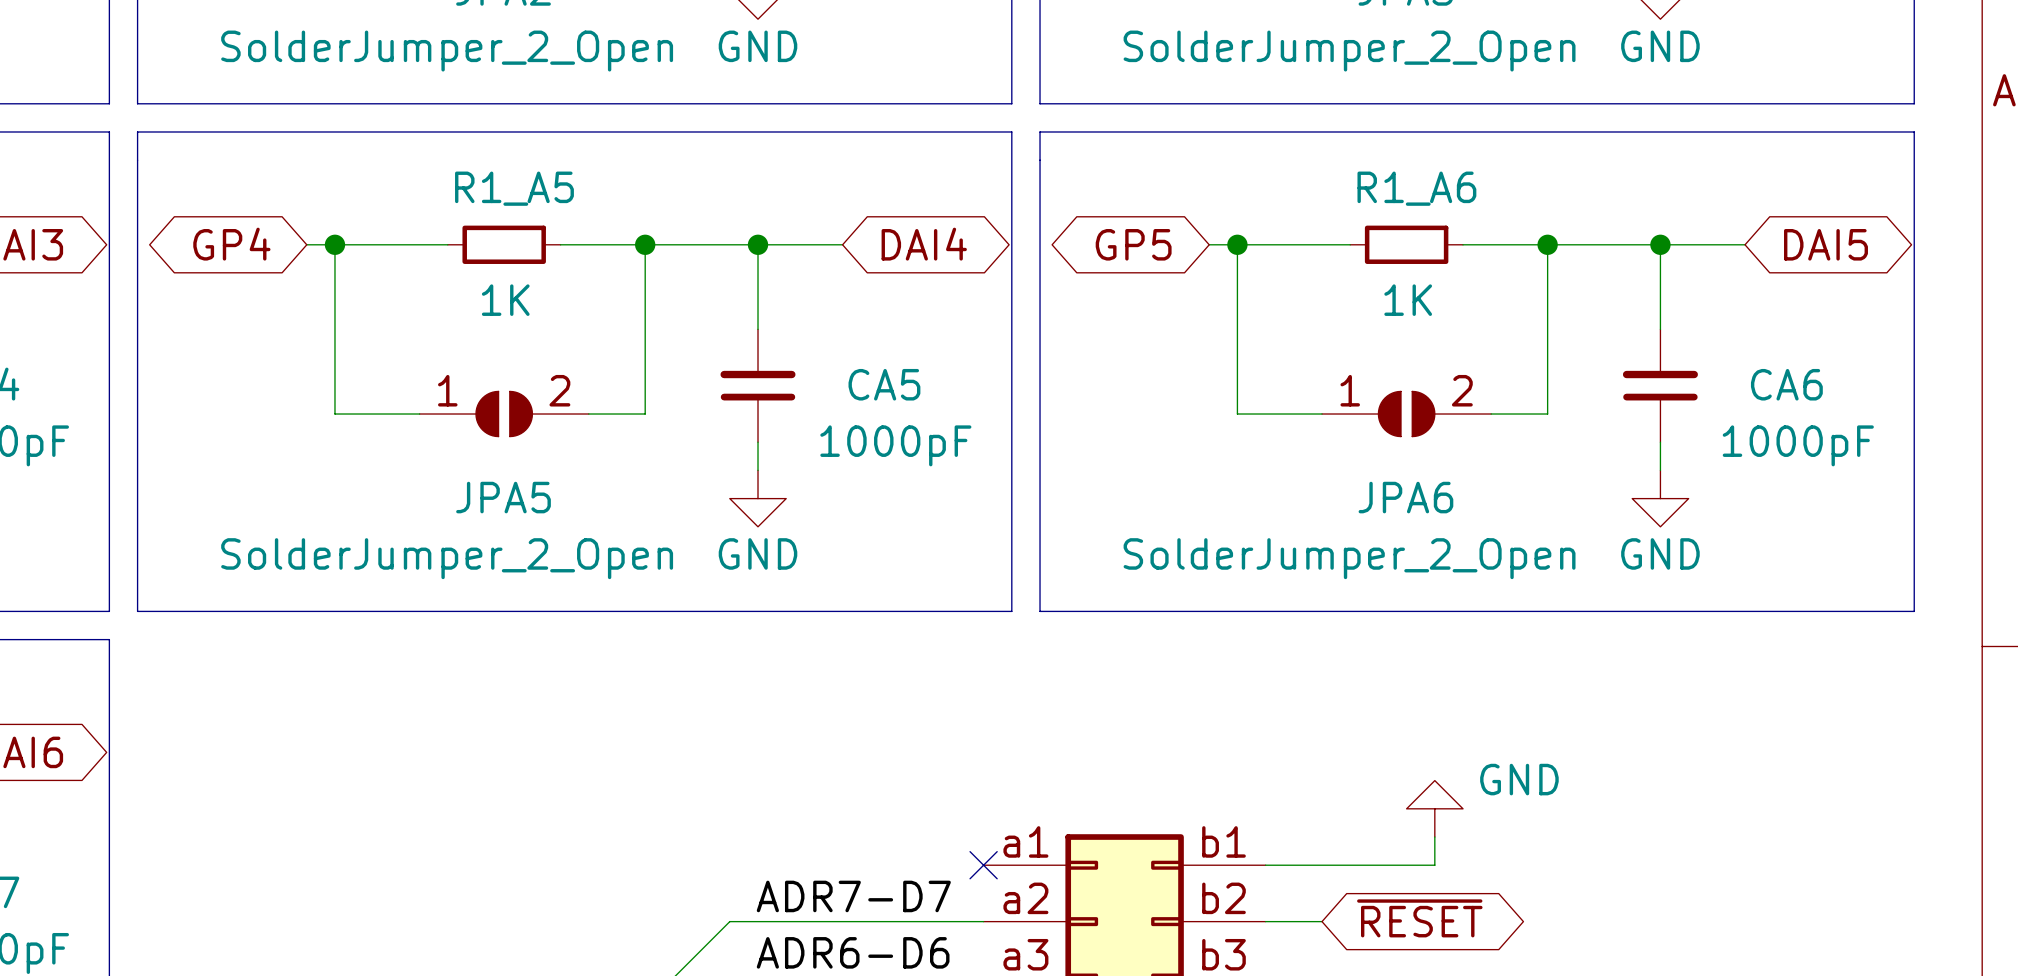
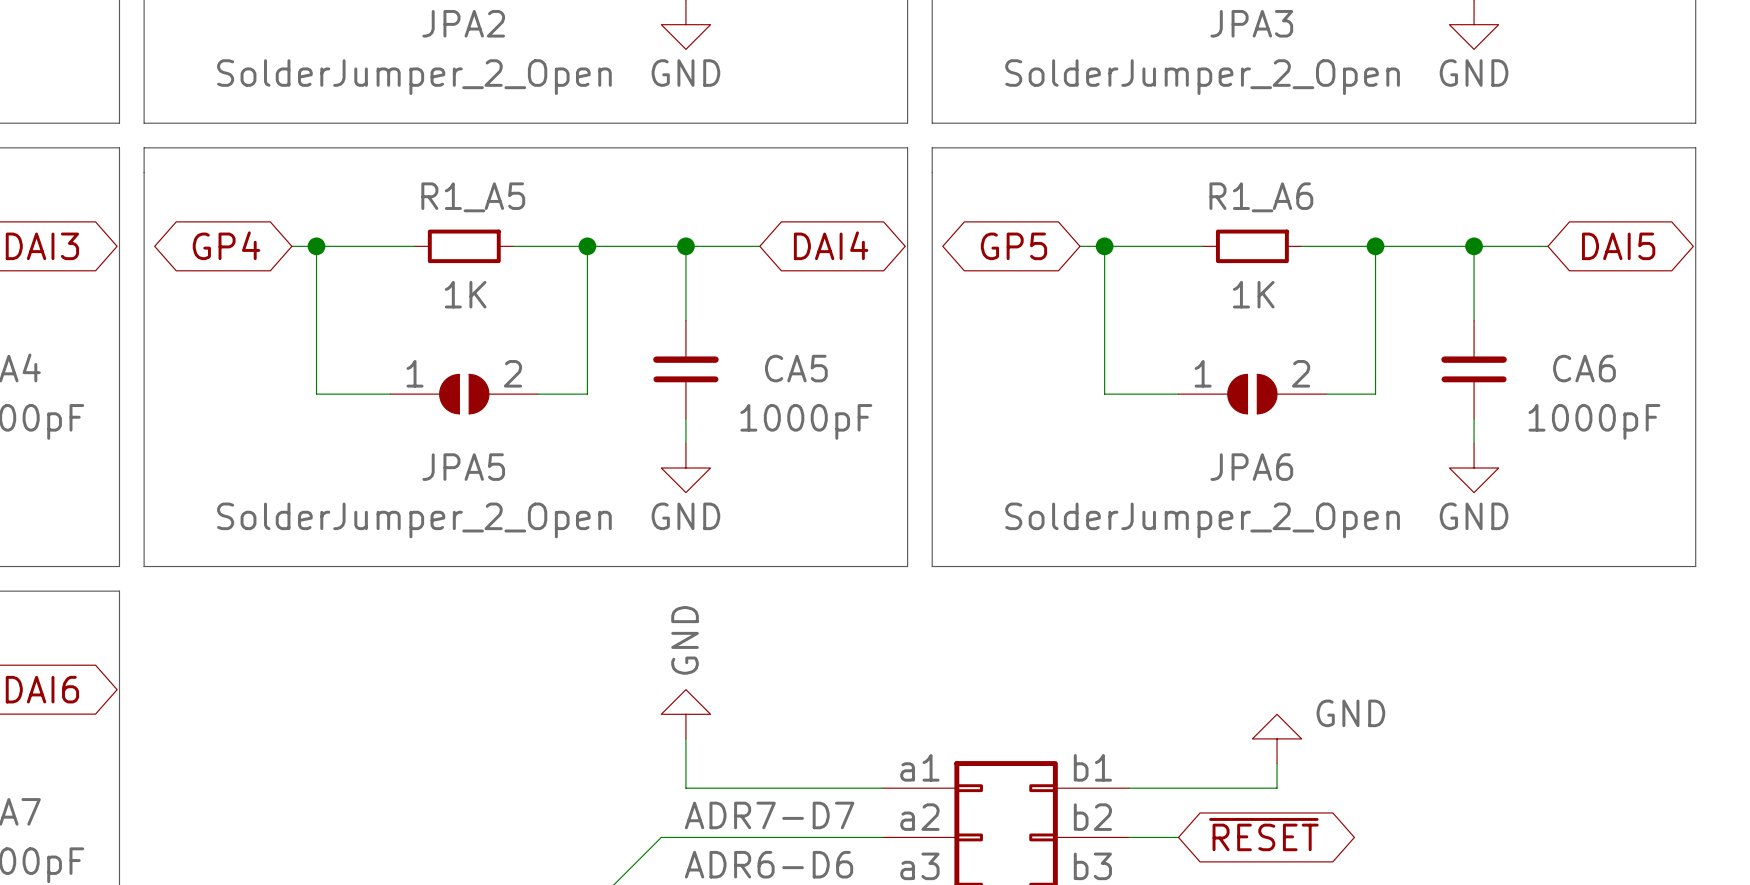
power symbol: none -> GND (685, 714)
wire: none -> (685, 738) (685, 788) (882, 788)
no-connect mark: (983, 865) -> none

